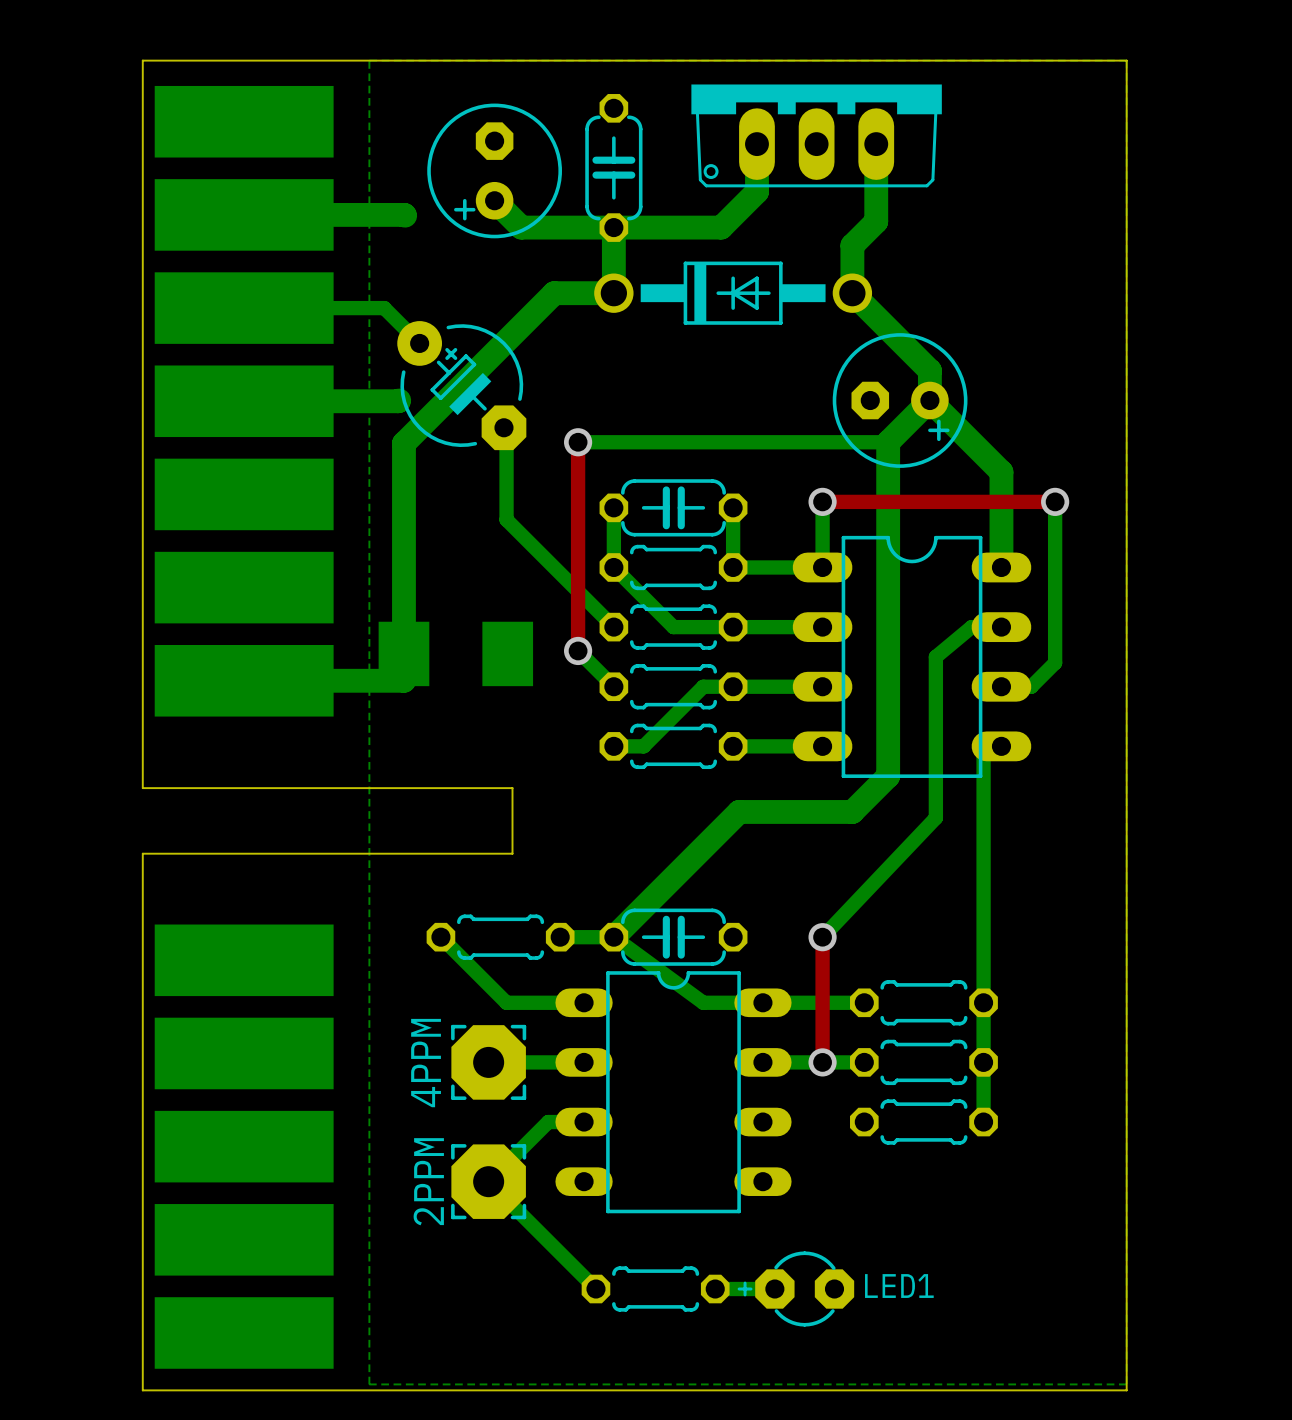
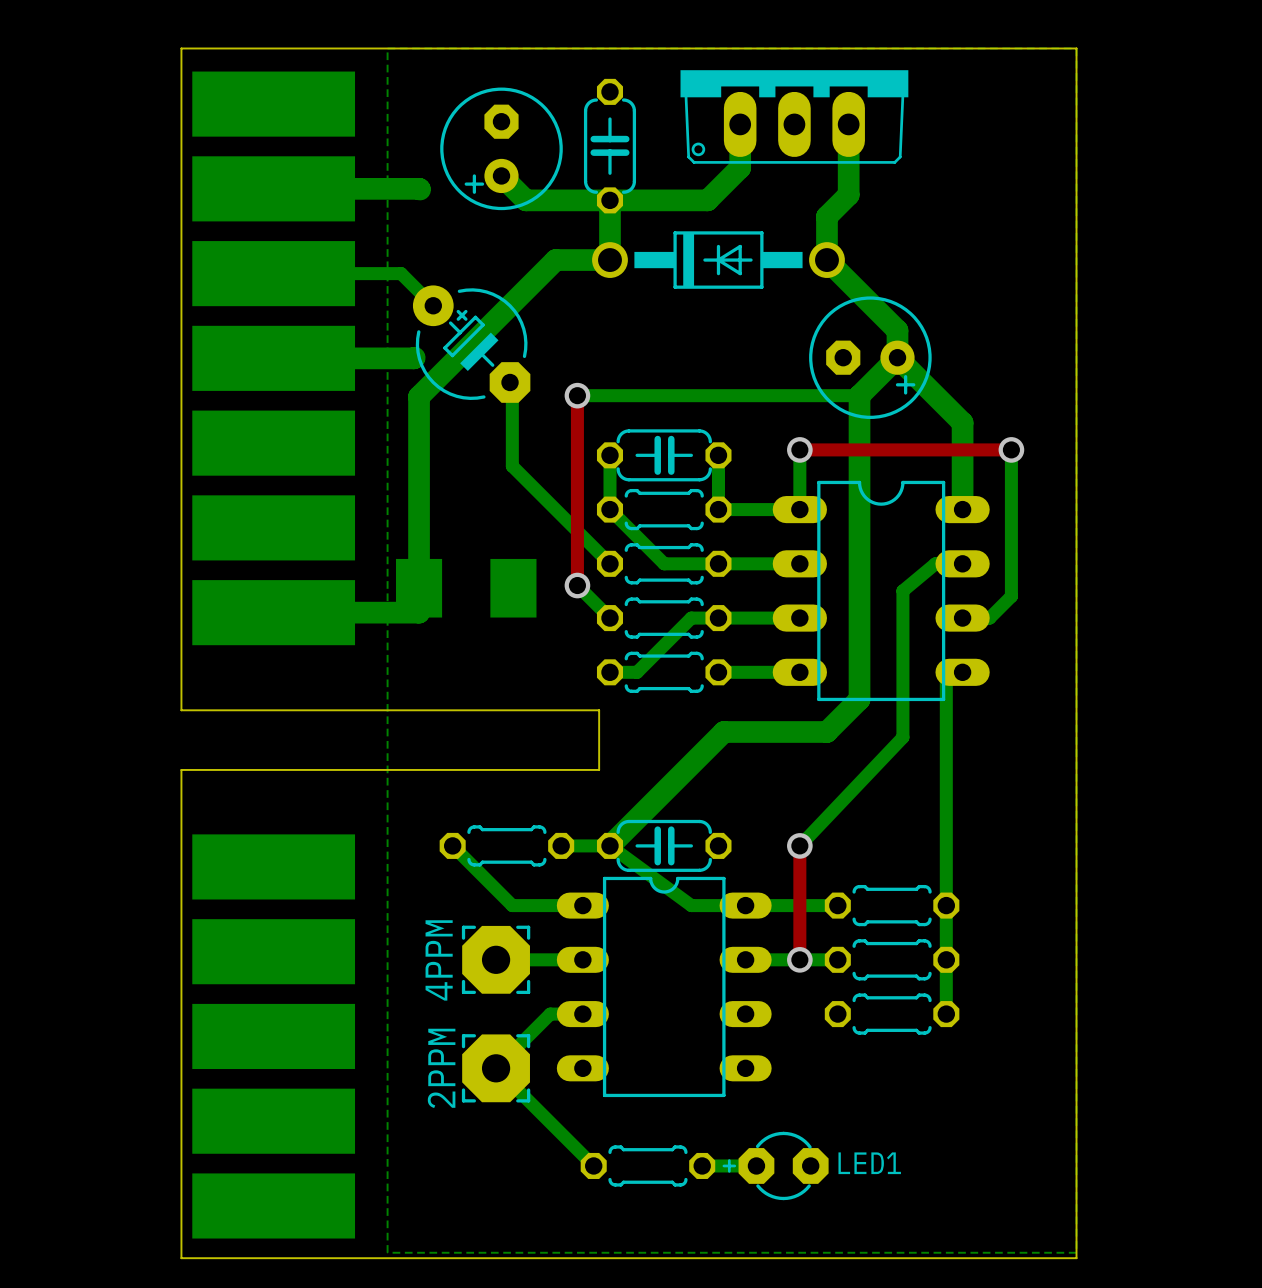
board edge: (512, 788) (512, 853) -> (517, 710) (599, 710) (599, 769) (517, 769)

